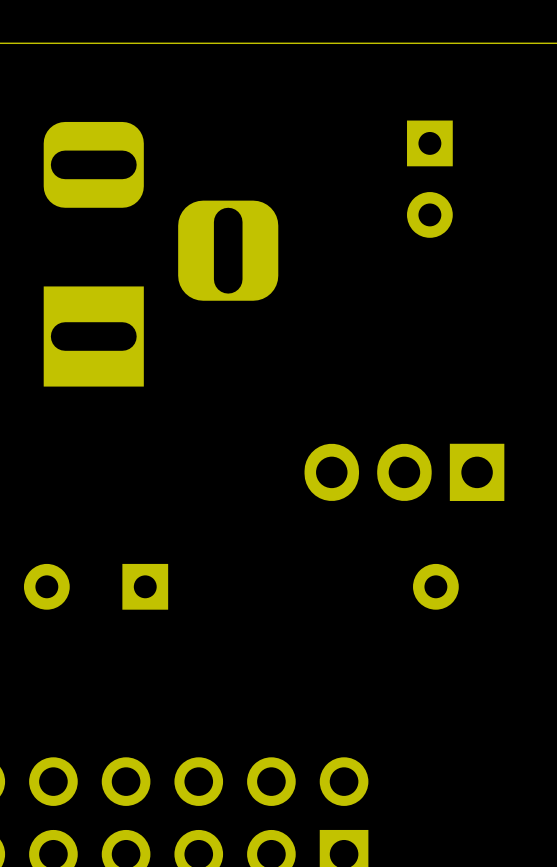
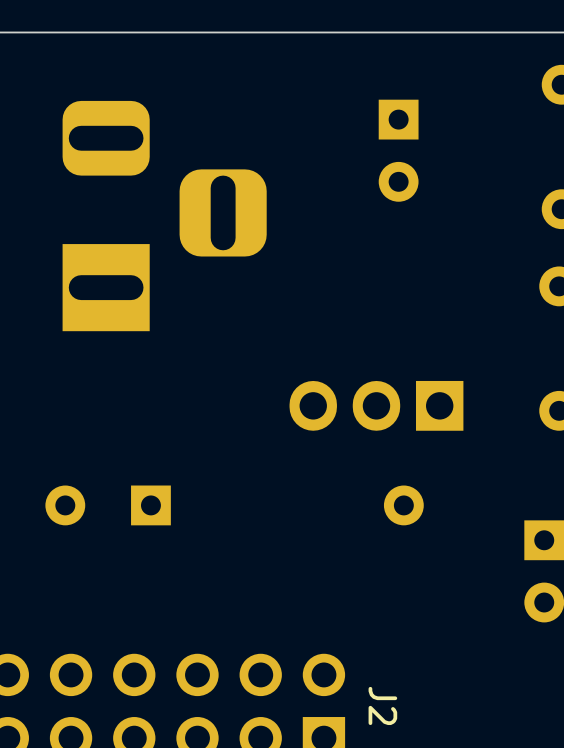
J2 name: none -> J2 (382, 705)

